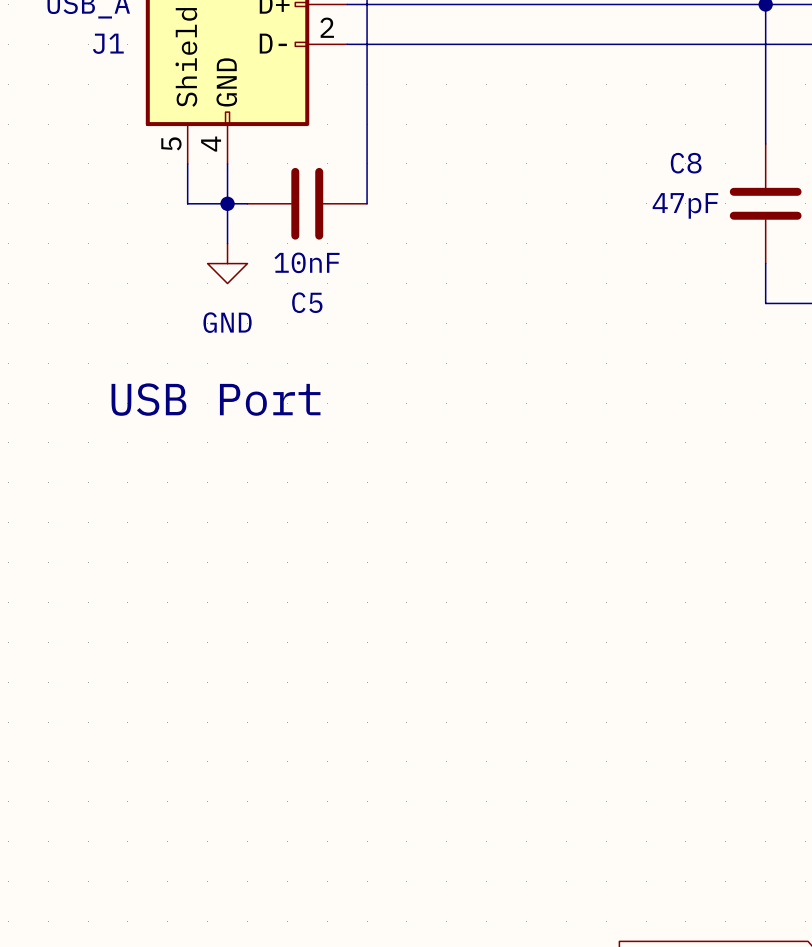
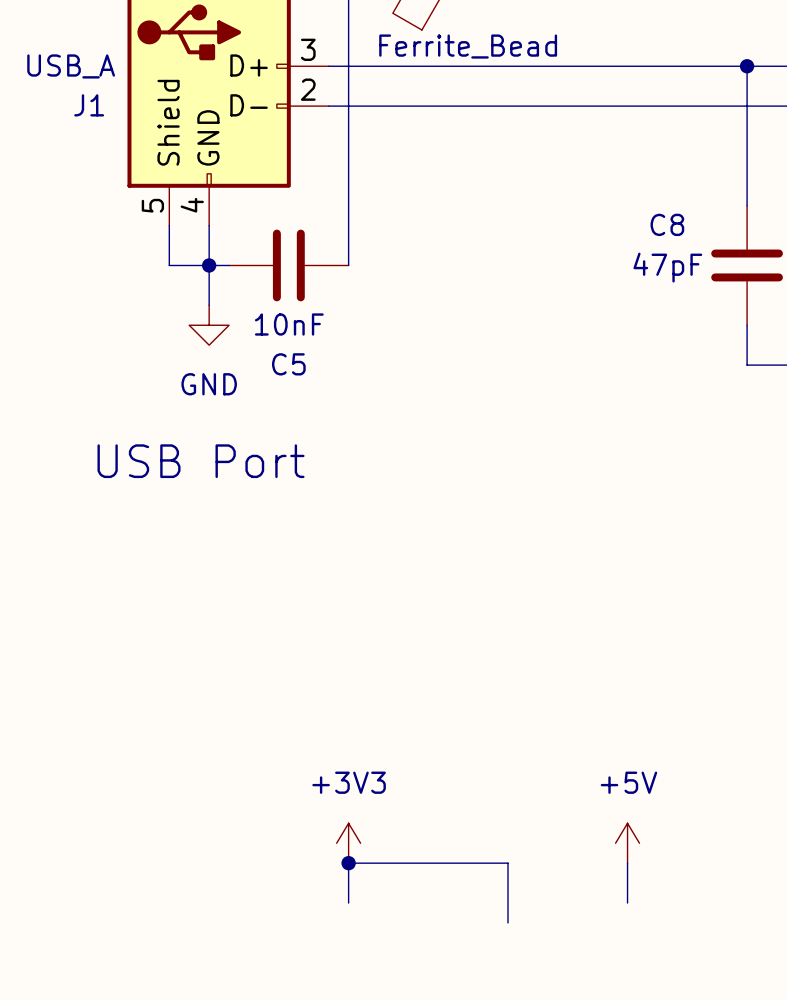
power symbol: none -> +3V3 (348, 843)
power symbol: none -> +5V (627, 843)
junction: none -> (348, 863)
wire: none -> (627, 863) (627, 903)
wire: none -> (348, 903) (348, 863) (508, 863) (508, 922)

